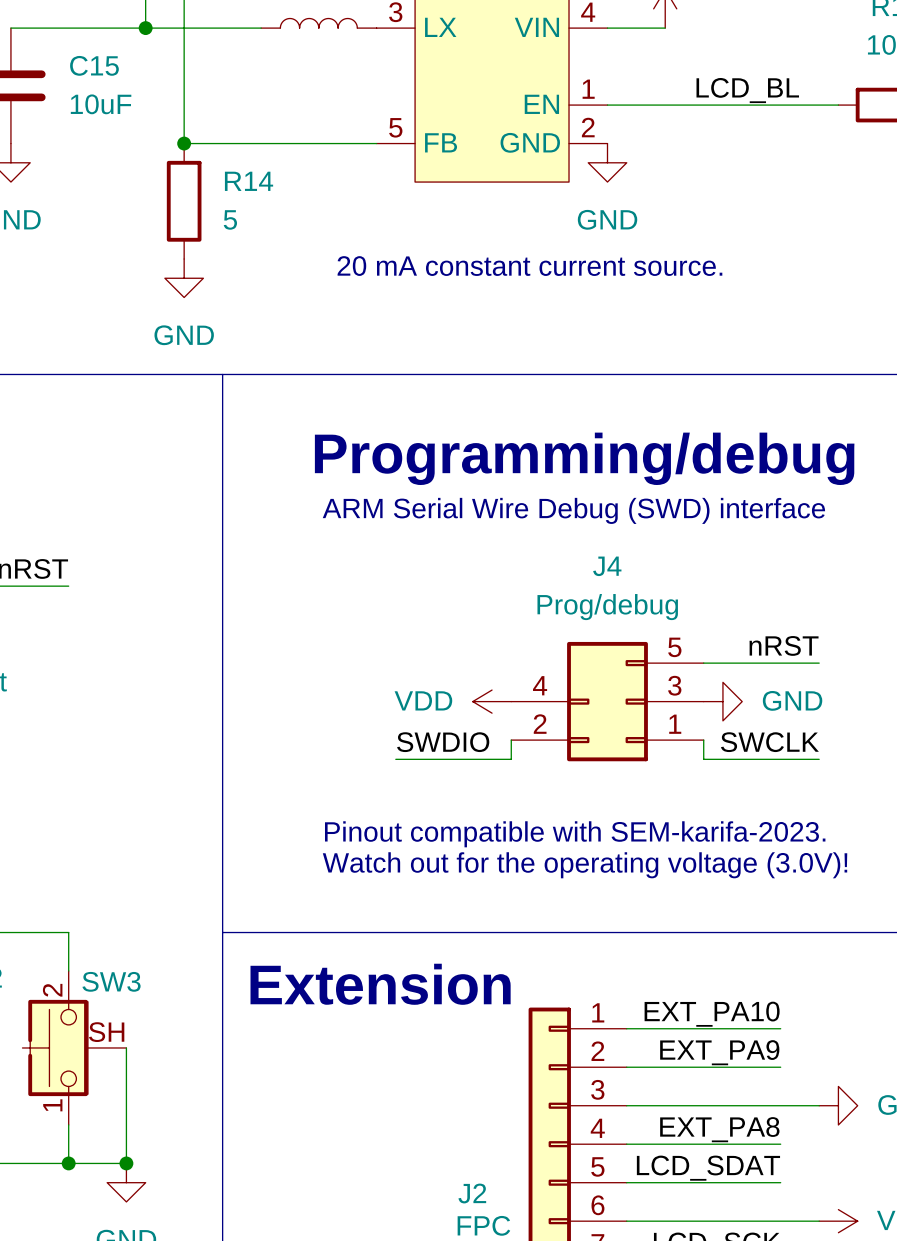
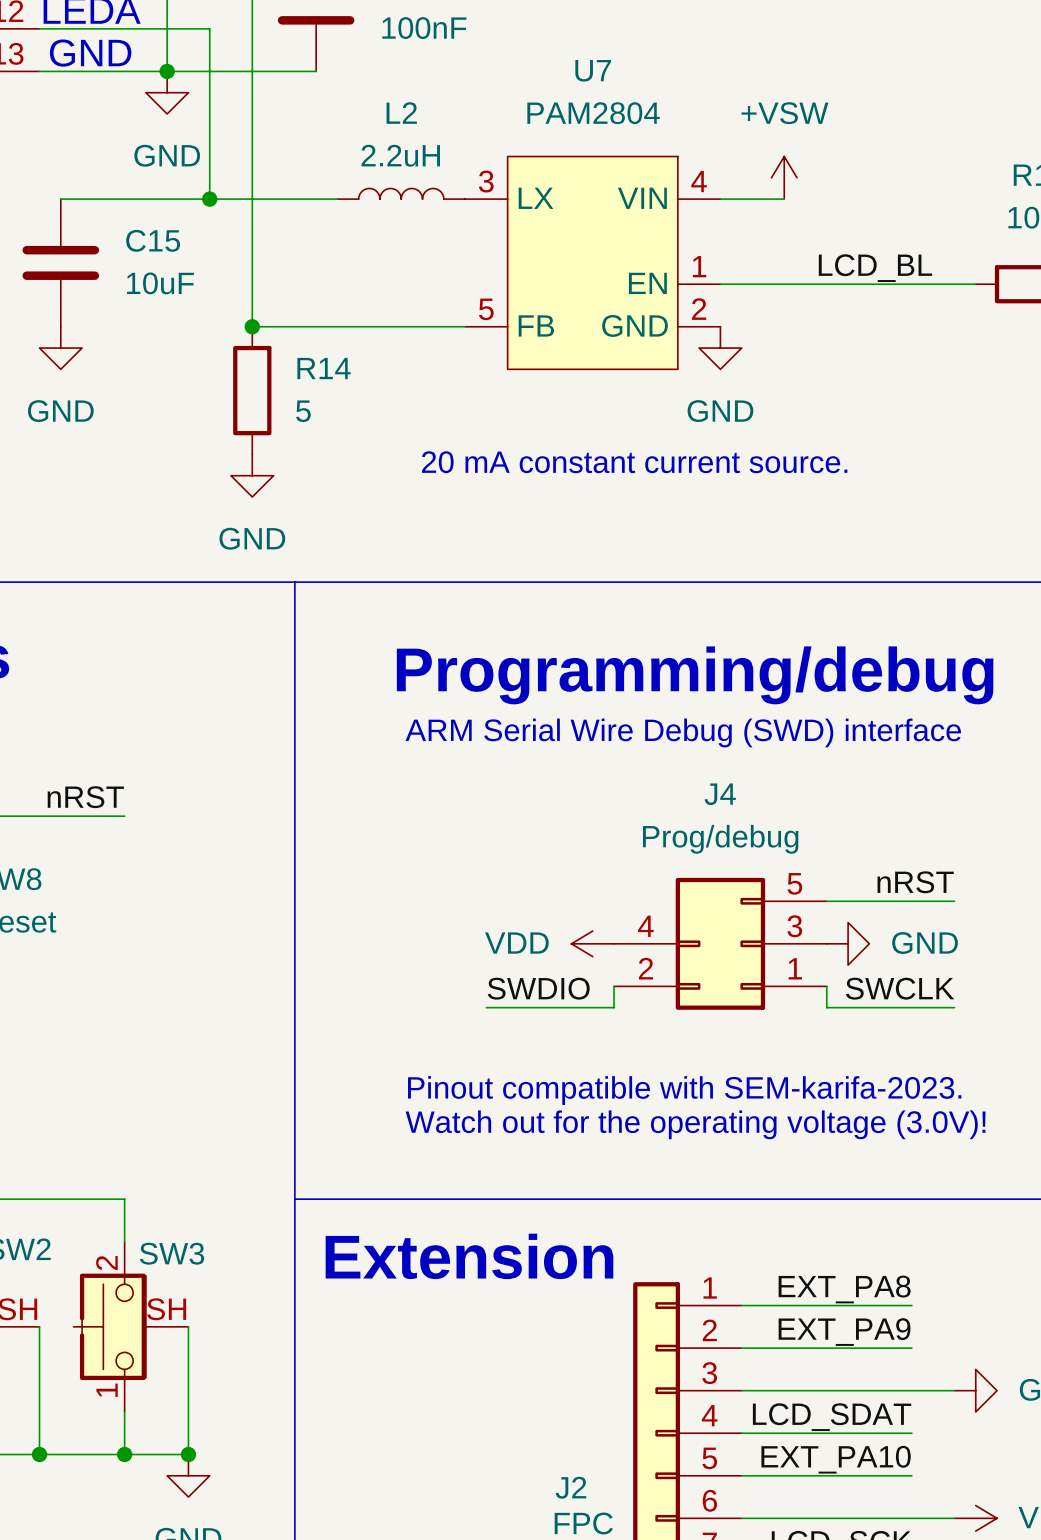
label: EXT_PA10 (712, 1014) -> EXT_PA8 (844, 1289)
label: EXT_PA8 (719, 1129) -> LCD_SDAT (832, 1417)
label: LCD_SDAT (708, 1168) -> EXT_PA10 (836, 1459)

